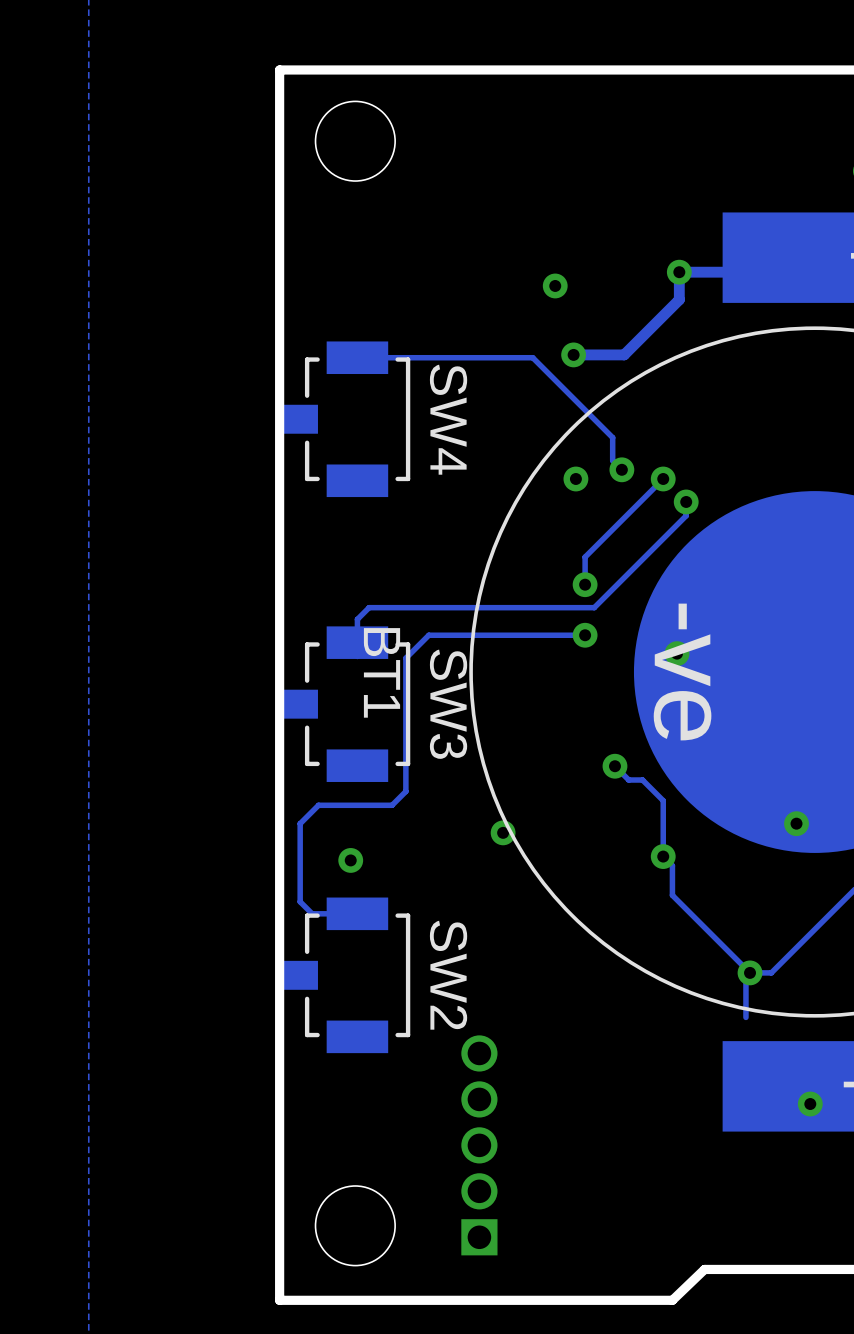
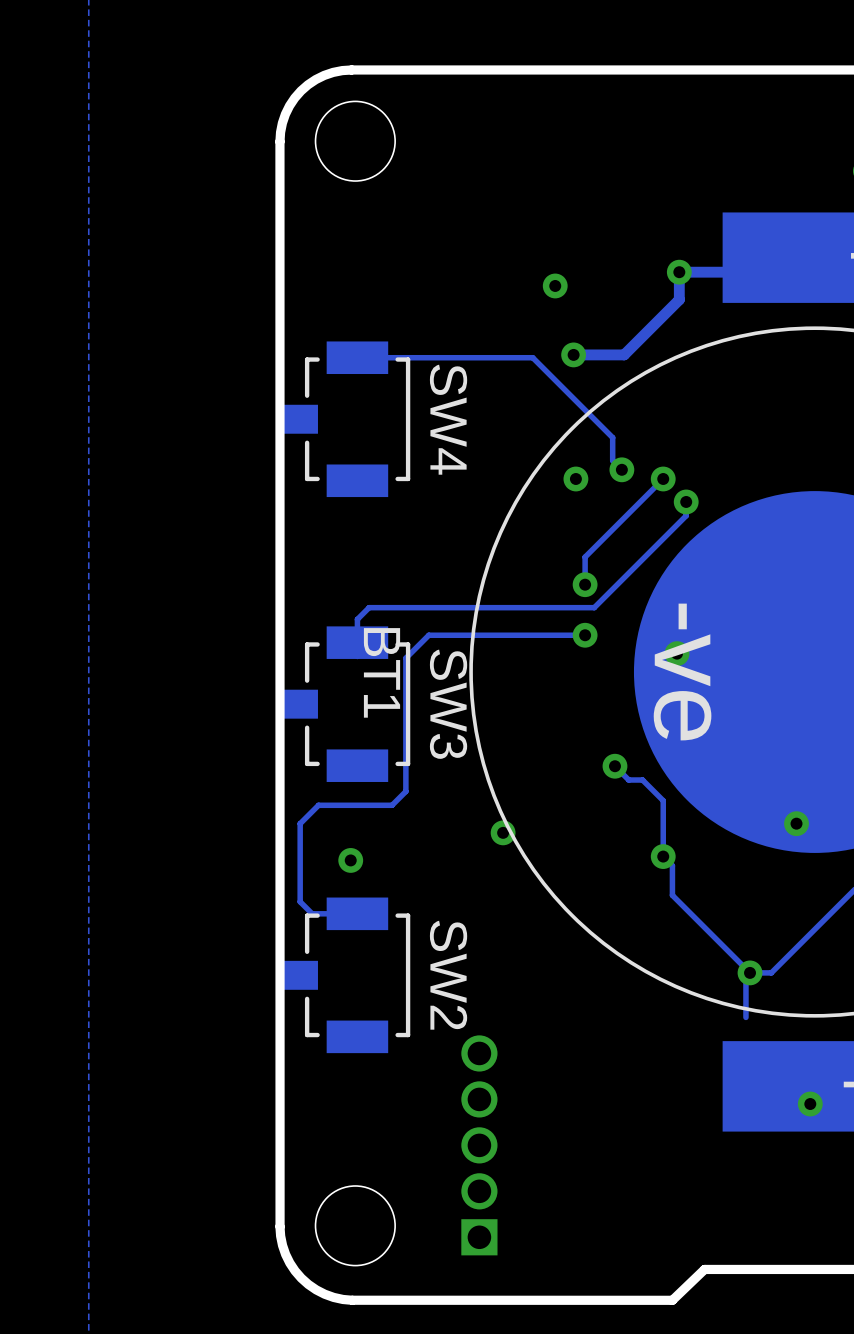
board edge: (351, 69) (279, 69) (279, 1300) (672, 1300) -> (351, 69) (324, 75) (300, 90) (285, 114) (279, 141) (280, 1226)
board edge: none -> (279, 1226) (282, 1245) (295, 1270) (316, 1289) (343, 1299) (672, 1300)

